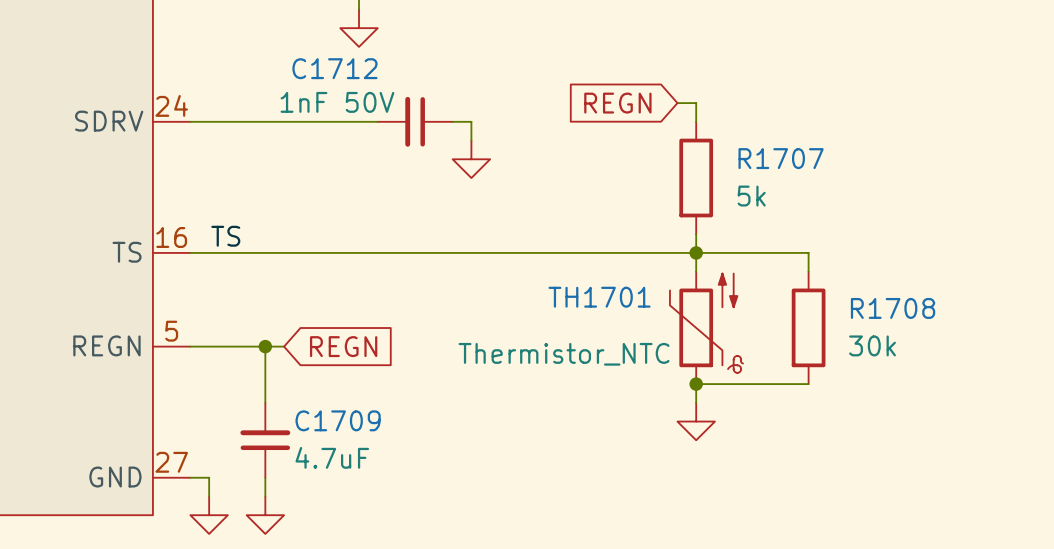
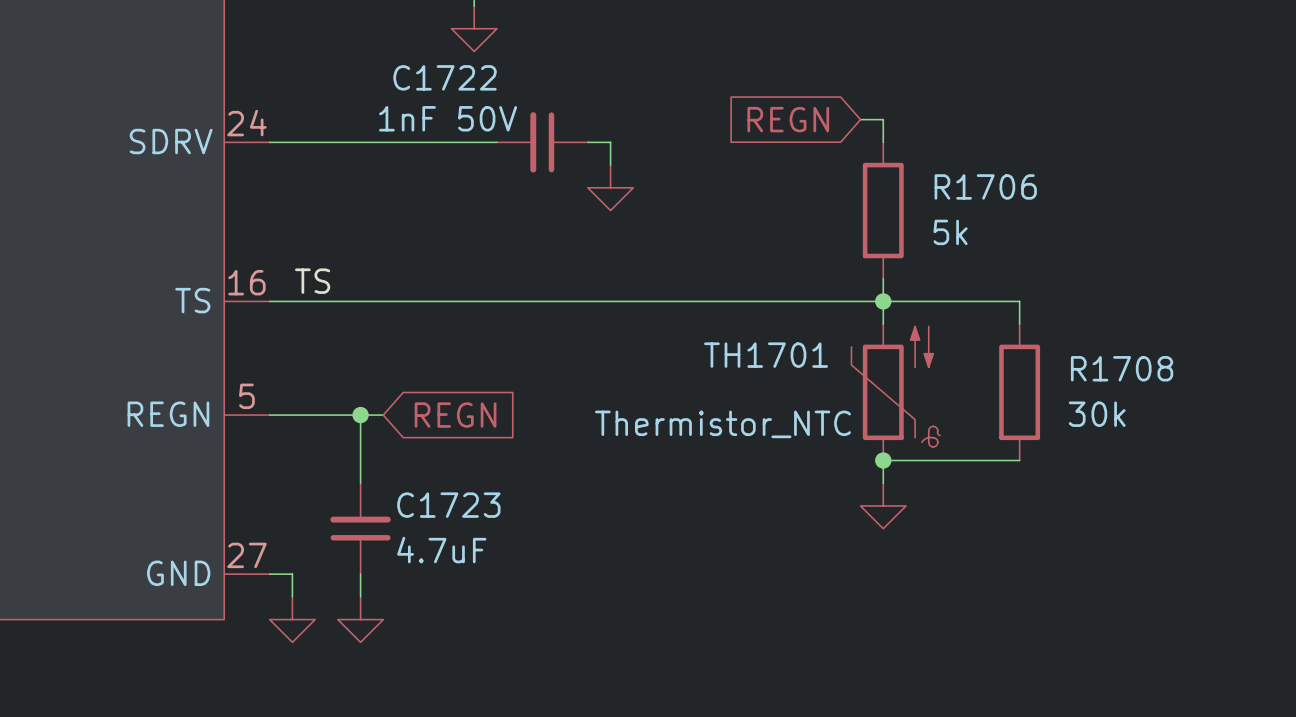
C1712 name: C1712 (334, 68) -> C1722 (445, 77)
R1707 name: R1707 (781, 158) -> R1706 (985, 186)
C1709 name: C1709 (338, 420) -> C1723 (448, 505)

